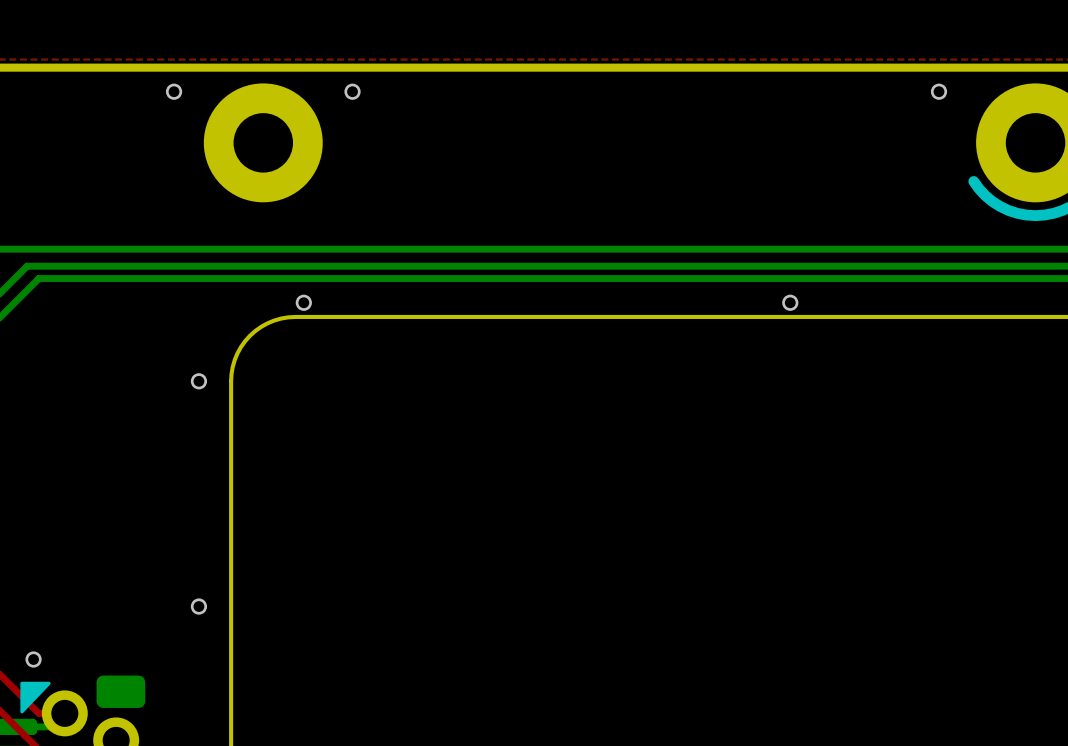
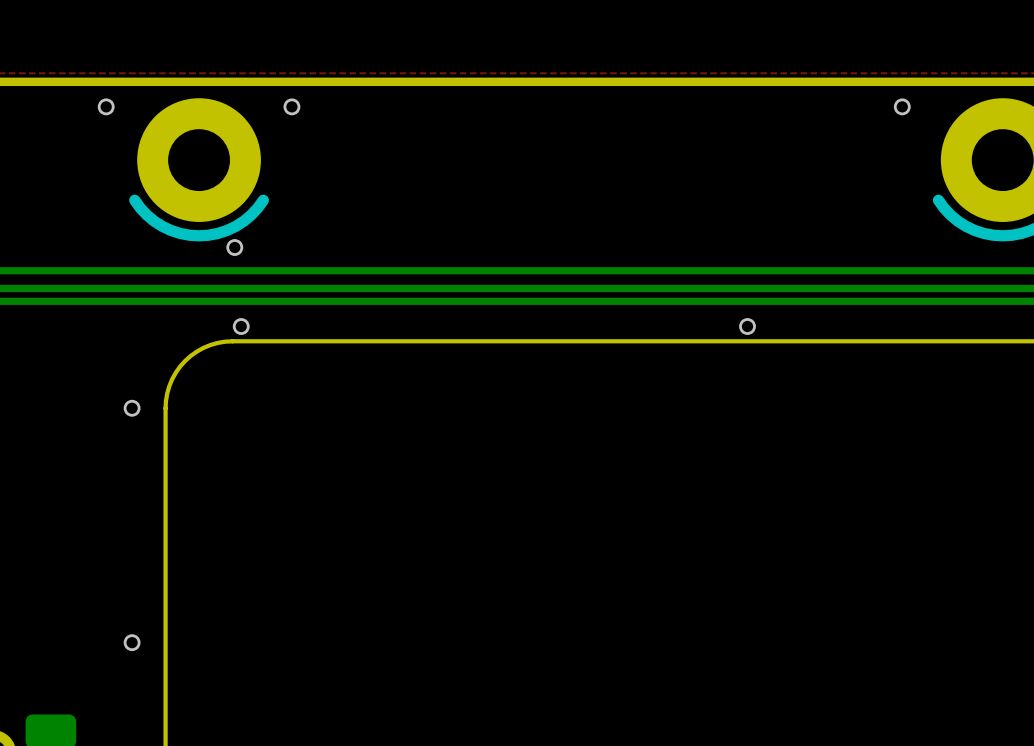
part side: bottom (263, 142) -> top (199, 169)
via: none -> (234, 247)

